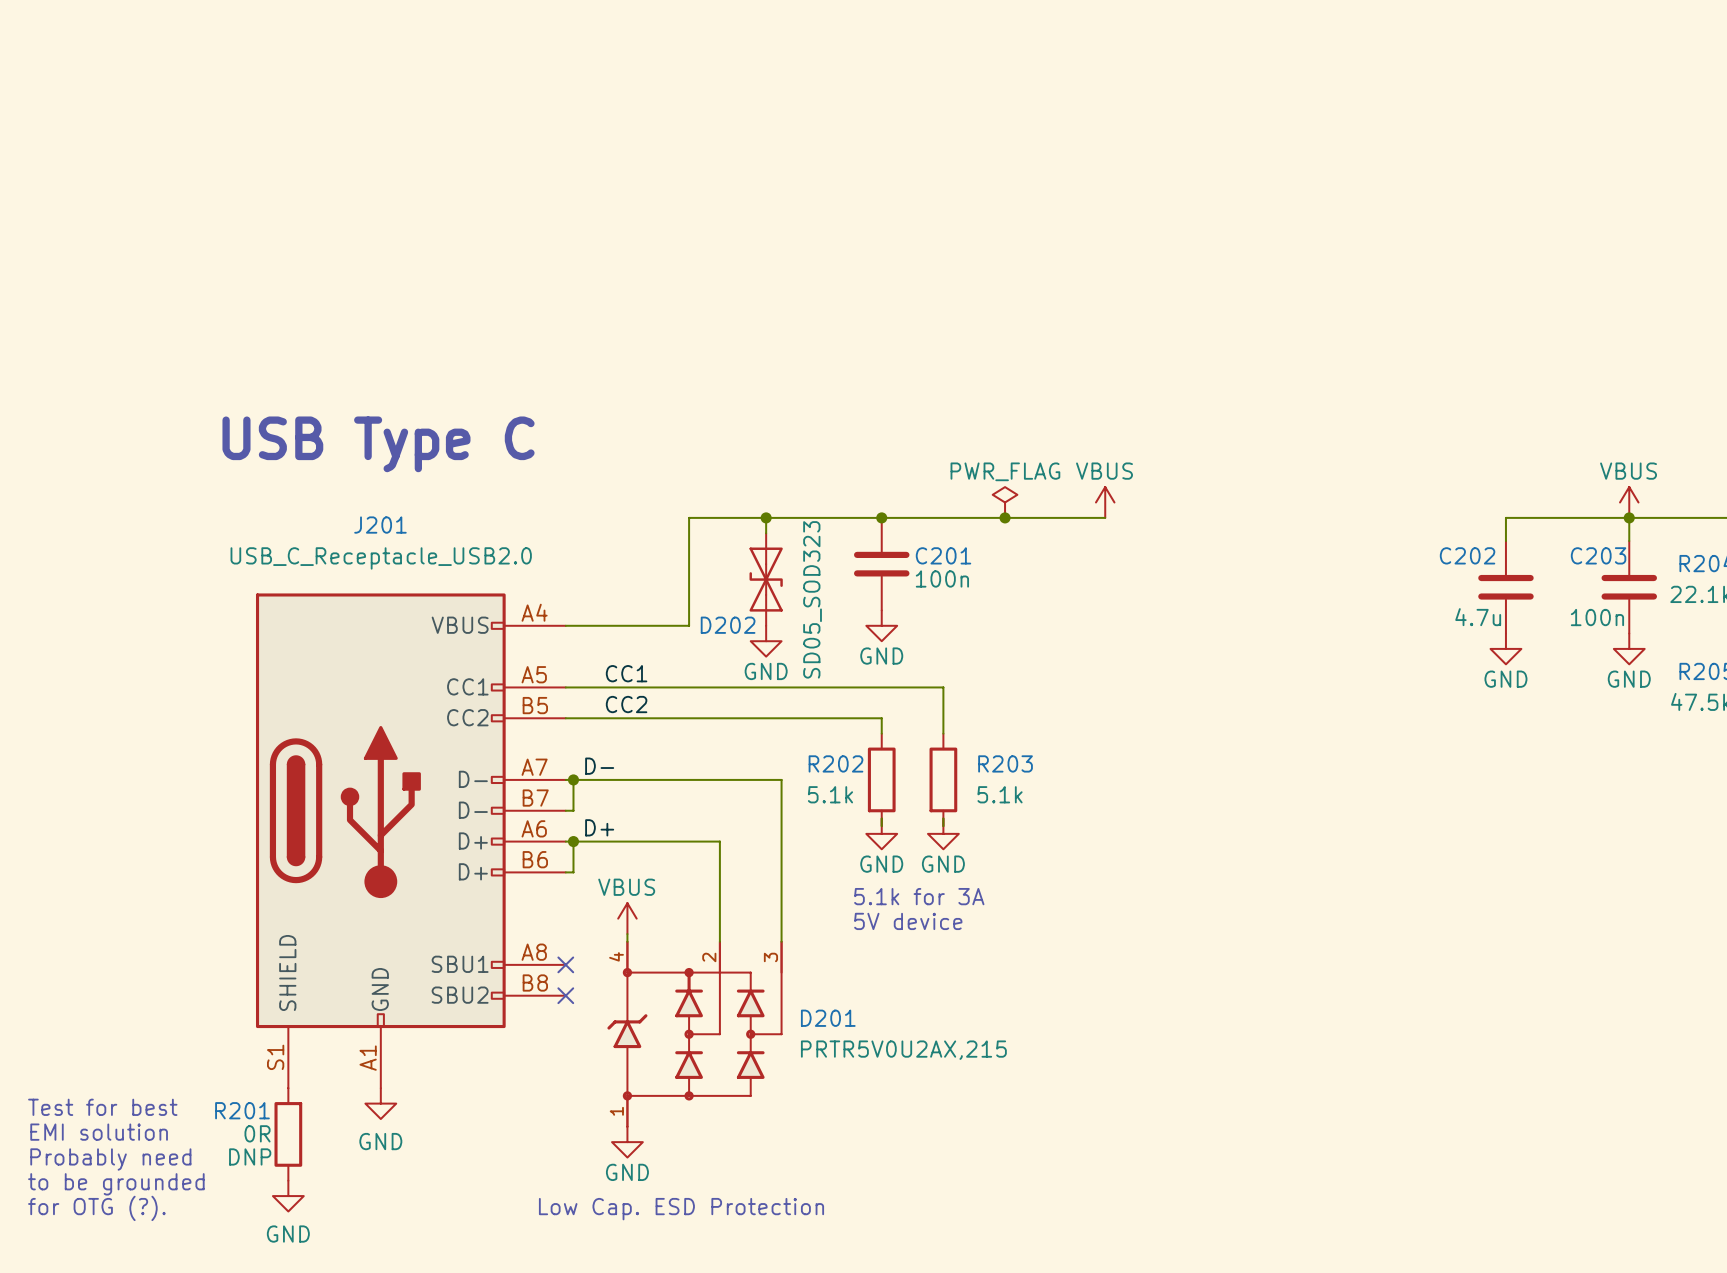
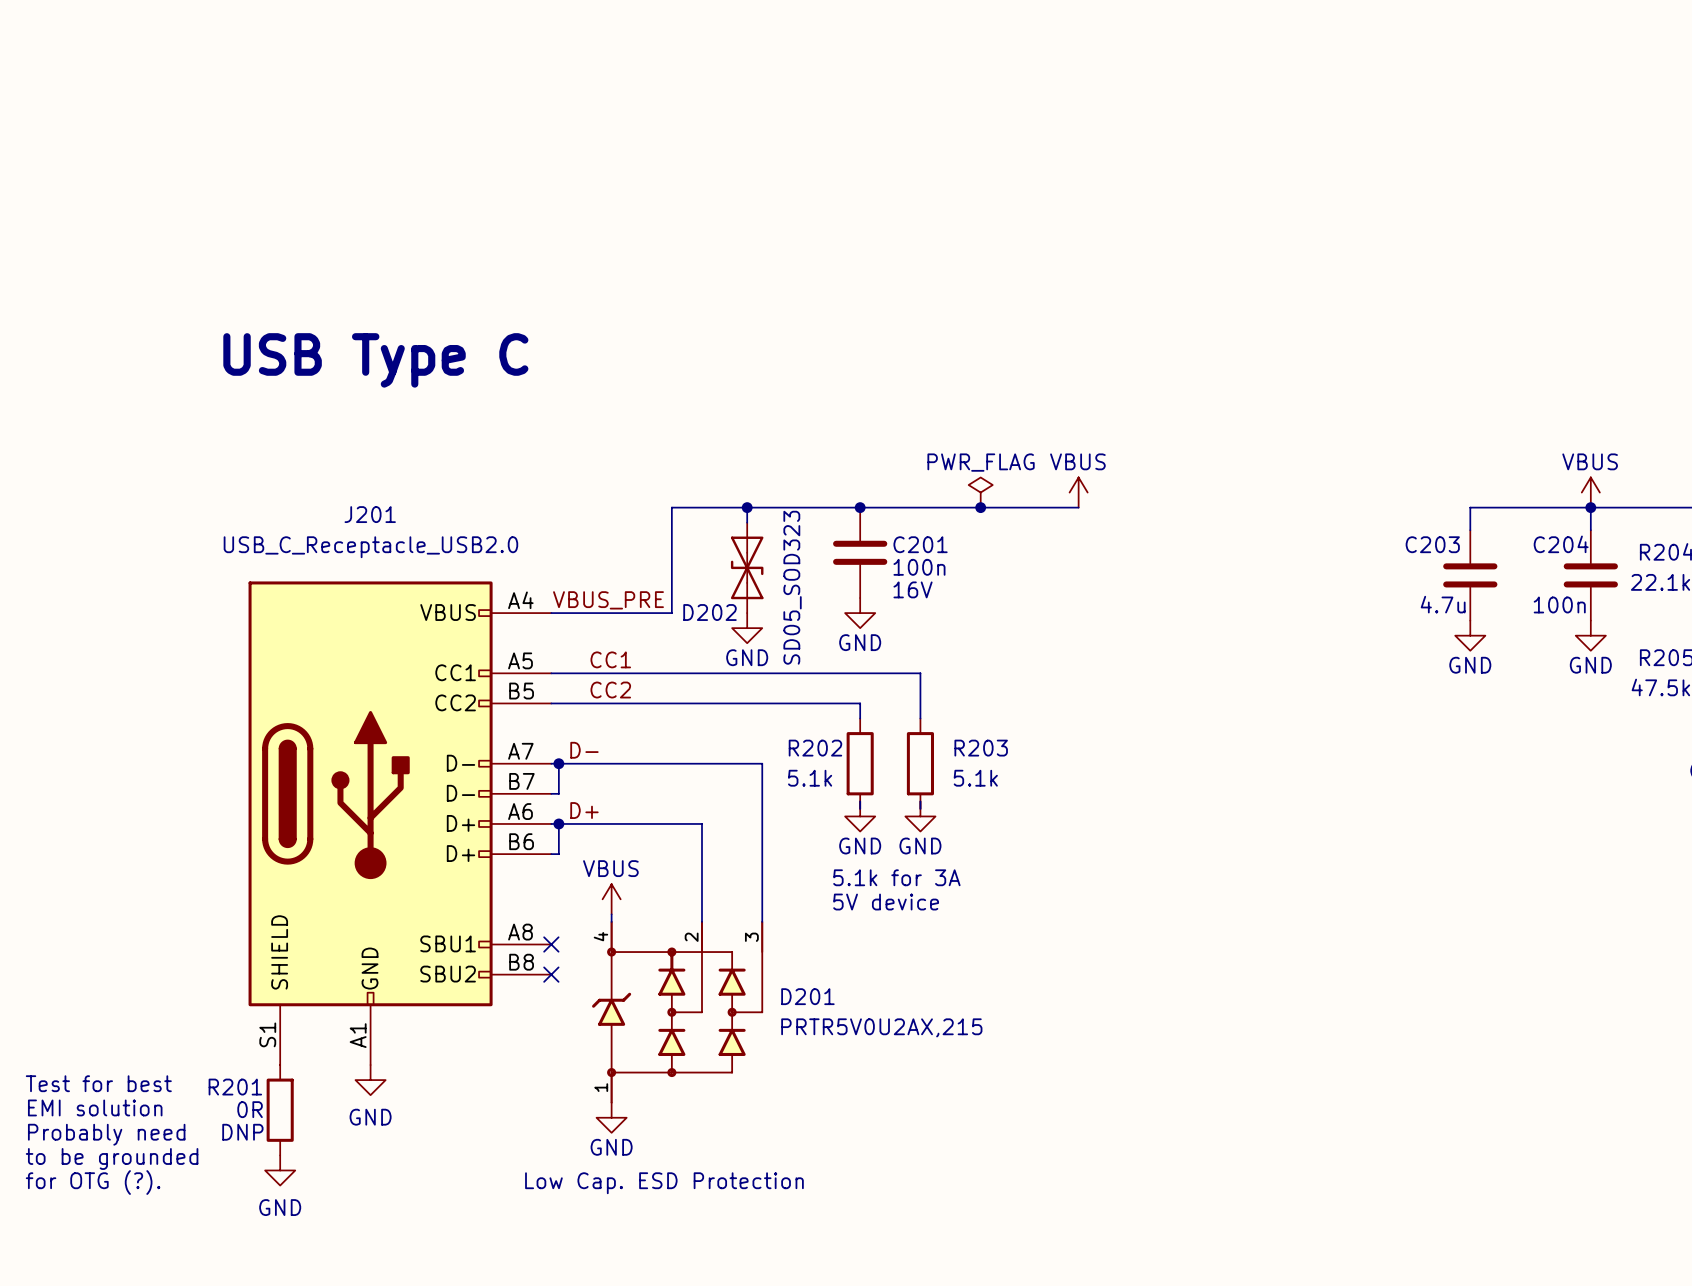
text position: USB Type C (378, 444) -> USB Type C (375, 360)
C202 name: C202 (1467, 555) -> C203 (1432, 544)
C203 name: C203 (1598, 555) -> C204 (1561, 544)
C201 text: none -> 16V (913, 589)
label: none -> VBUS_PRE (608, 600)

